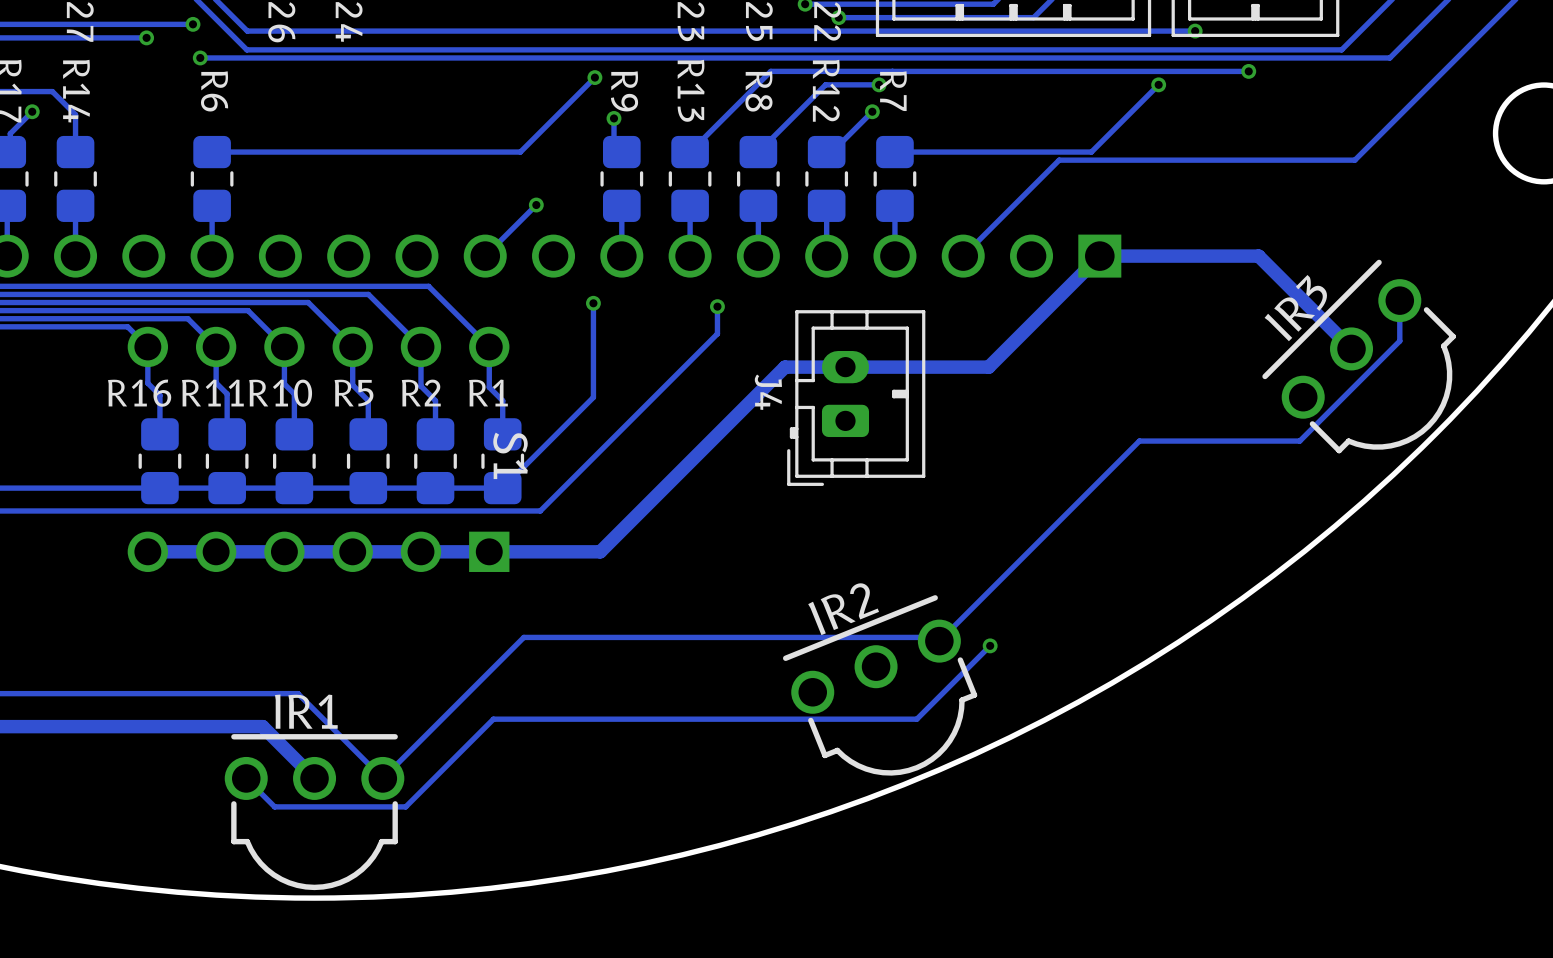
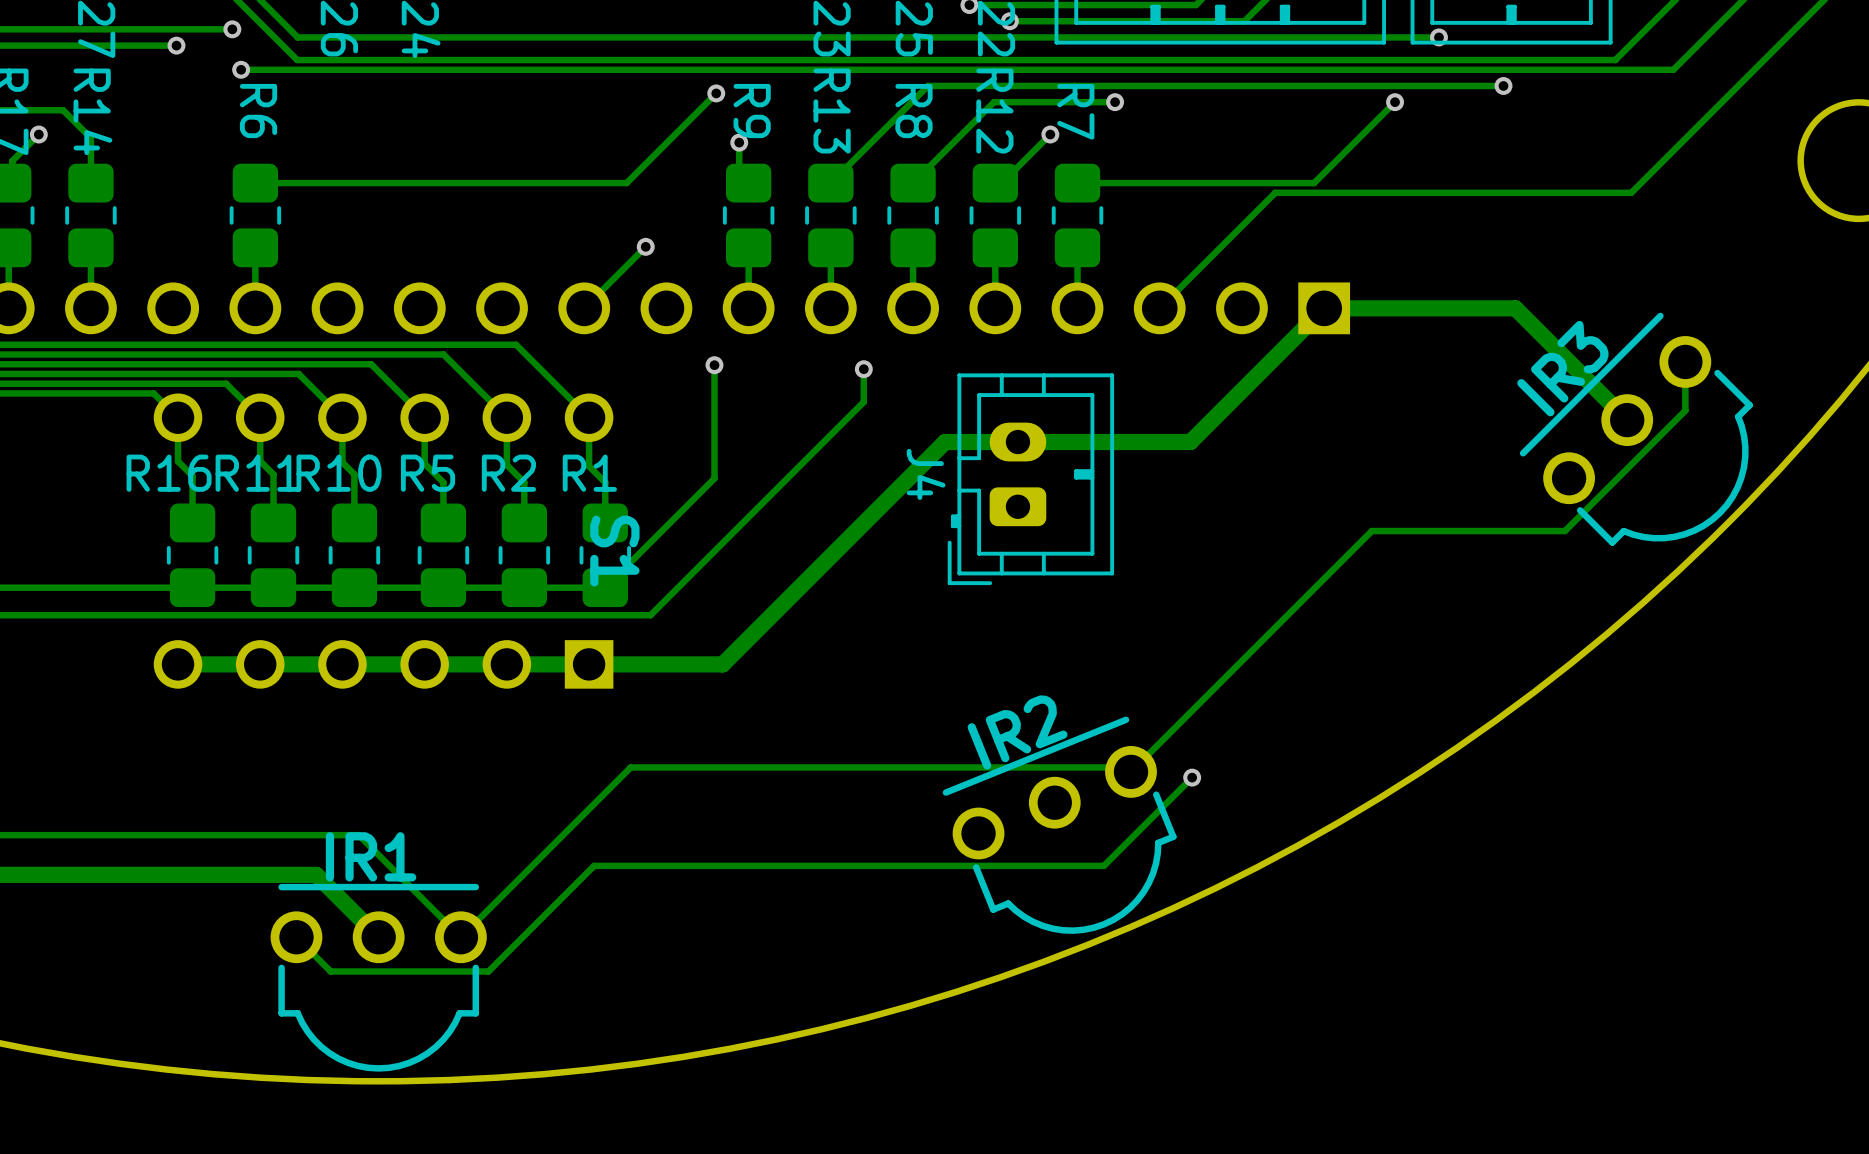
via position: (879, 84) -> (1115, 102)
track: none -> (1115, 102) (1058, 102)

